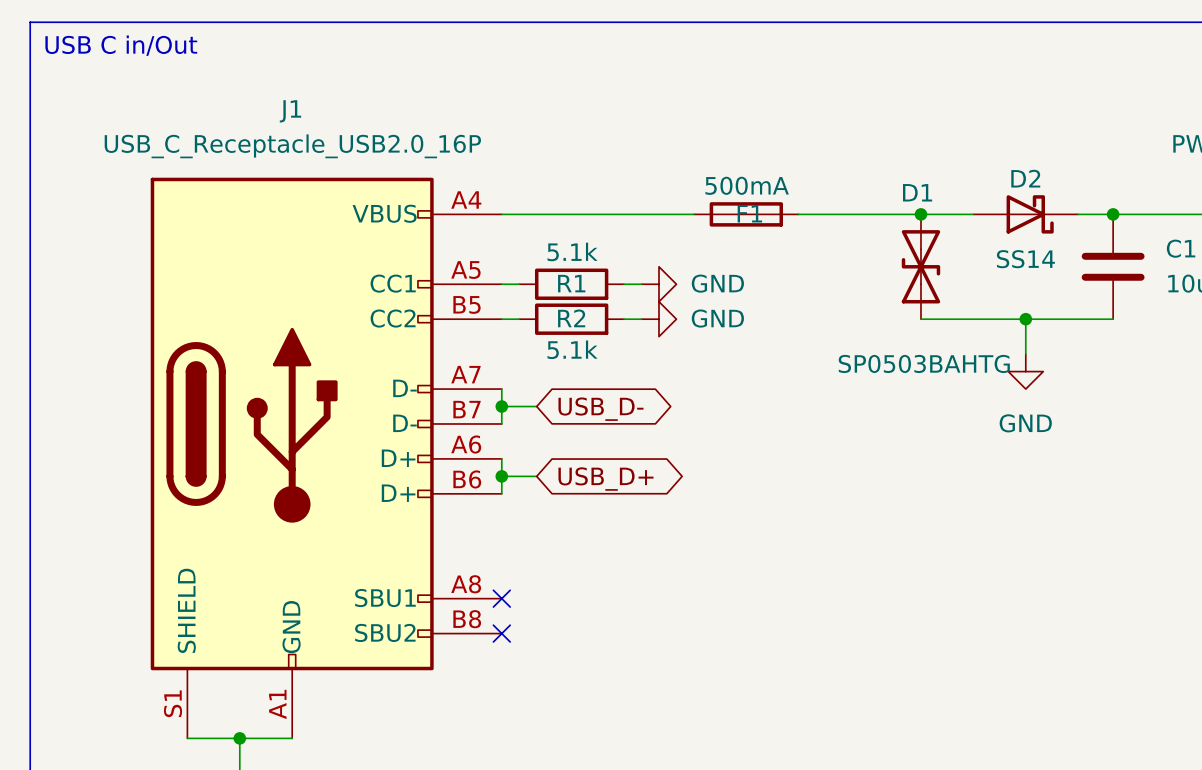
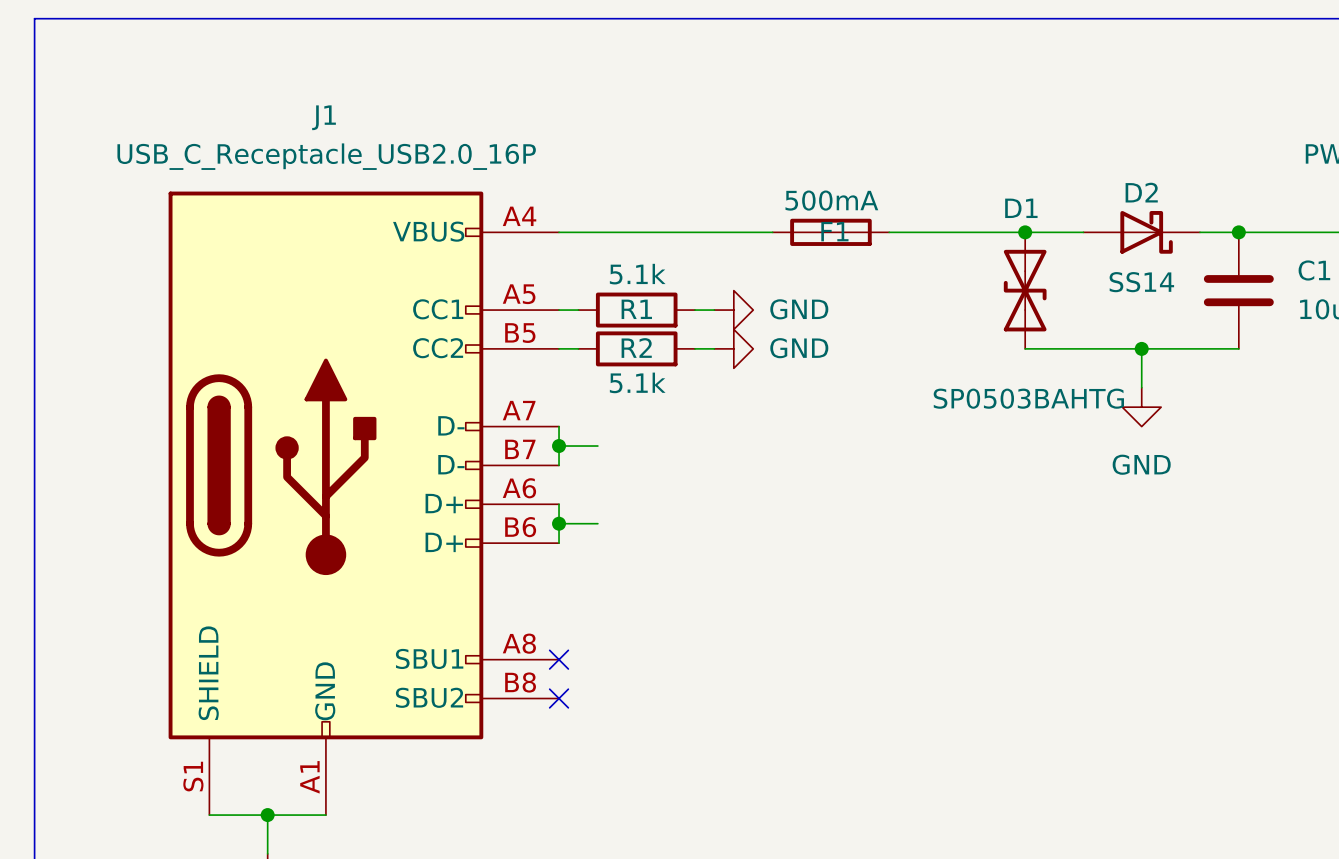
text: USB C in/Out (121, 45) -> none
global label: USB_D- (600, 409) -> none
global label: USB_D+ (605, 479) -> none

